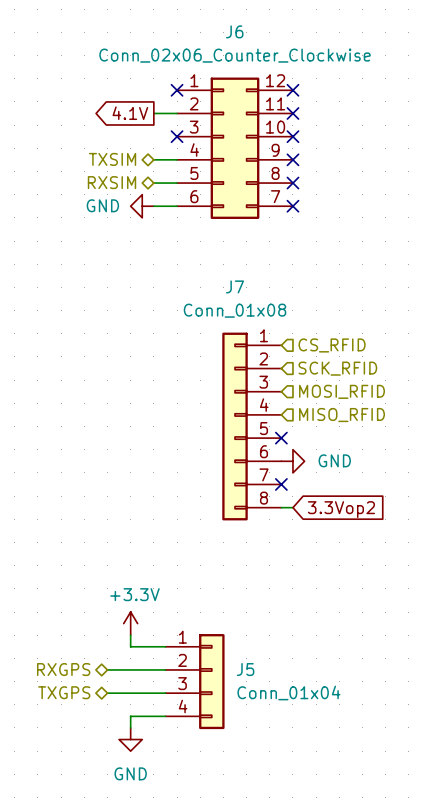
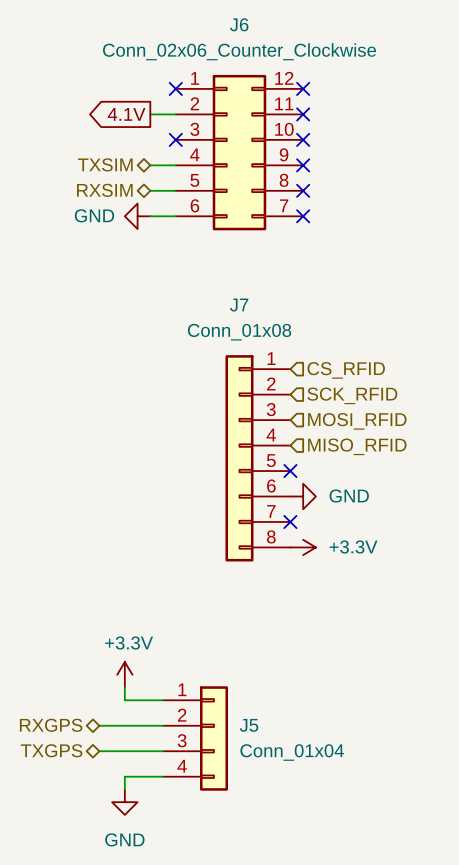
power symbol: none -> +3.3V (303, 547)
global label: 3.3Vop2 (341, 509) -> none

